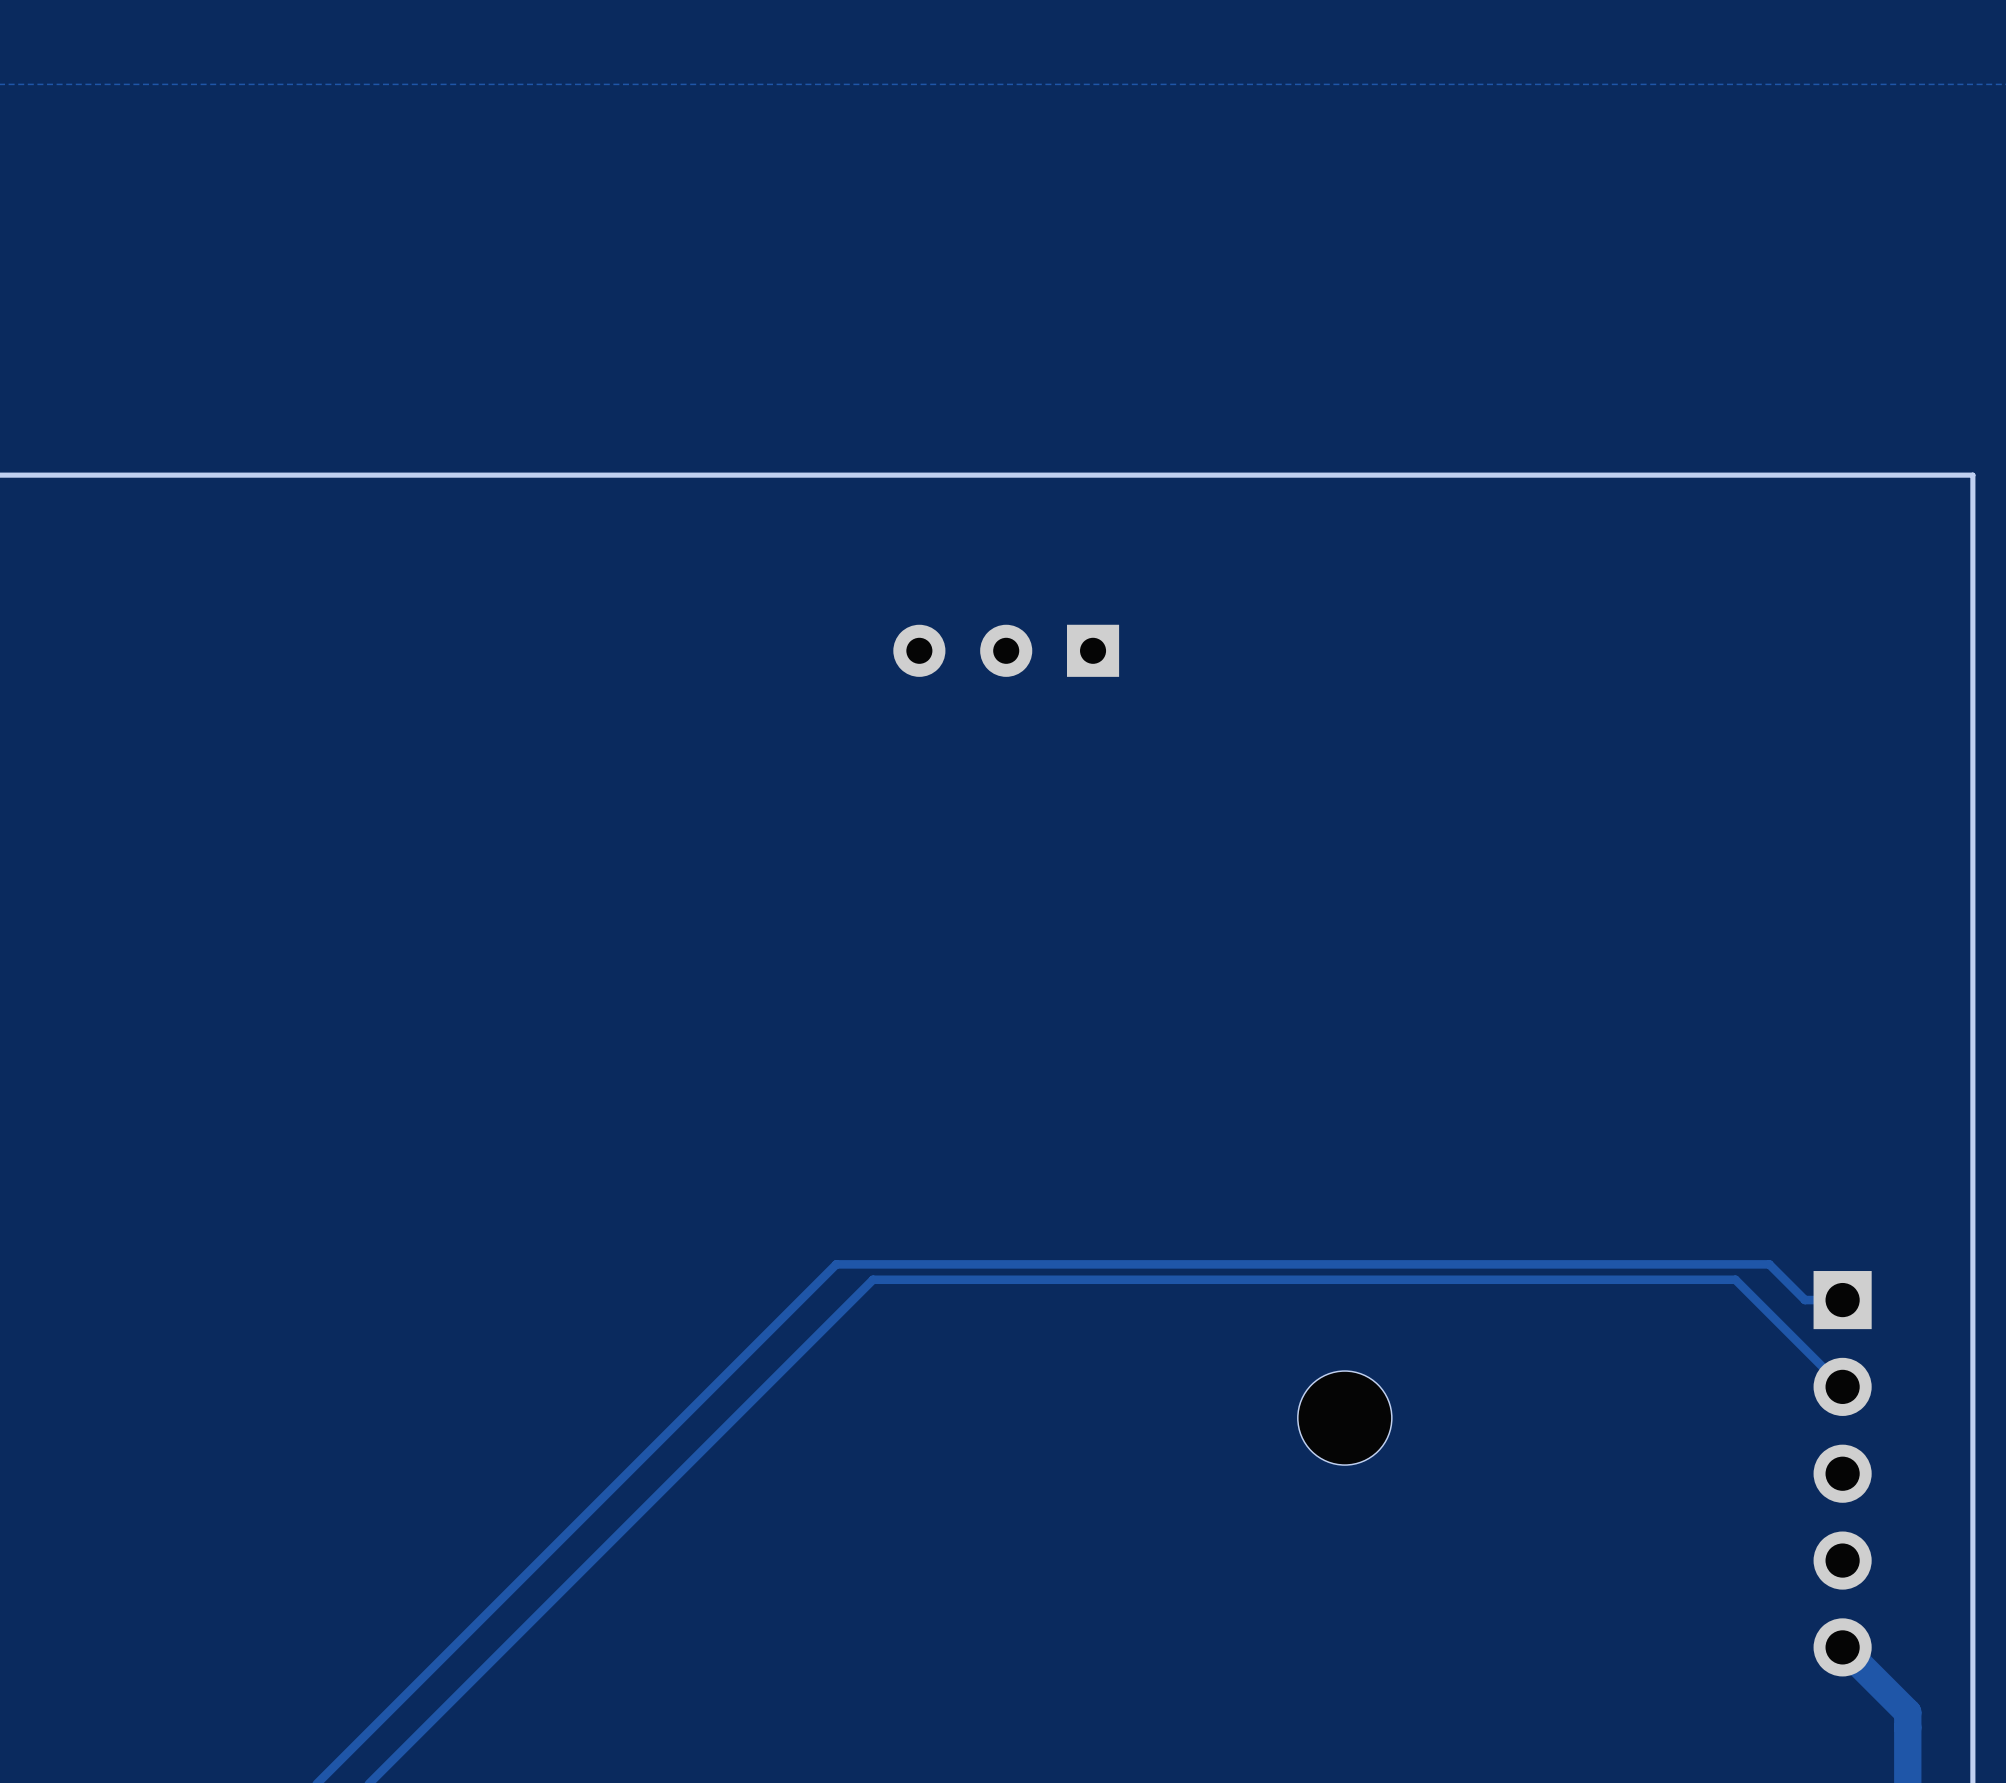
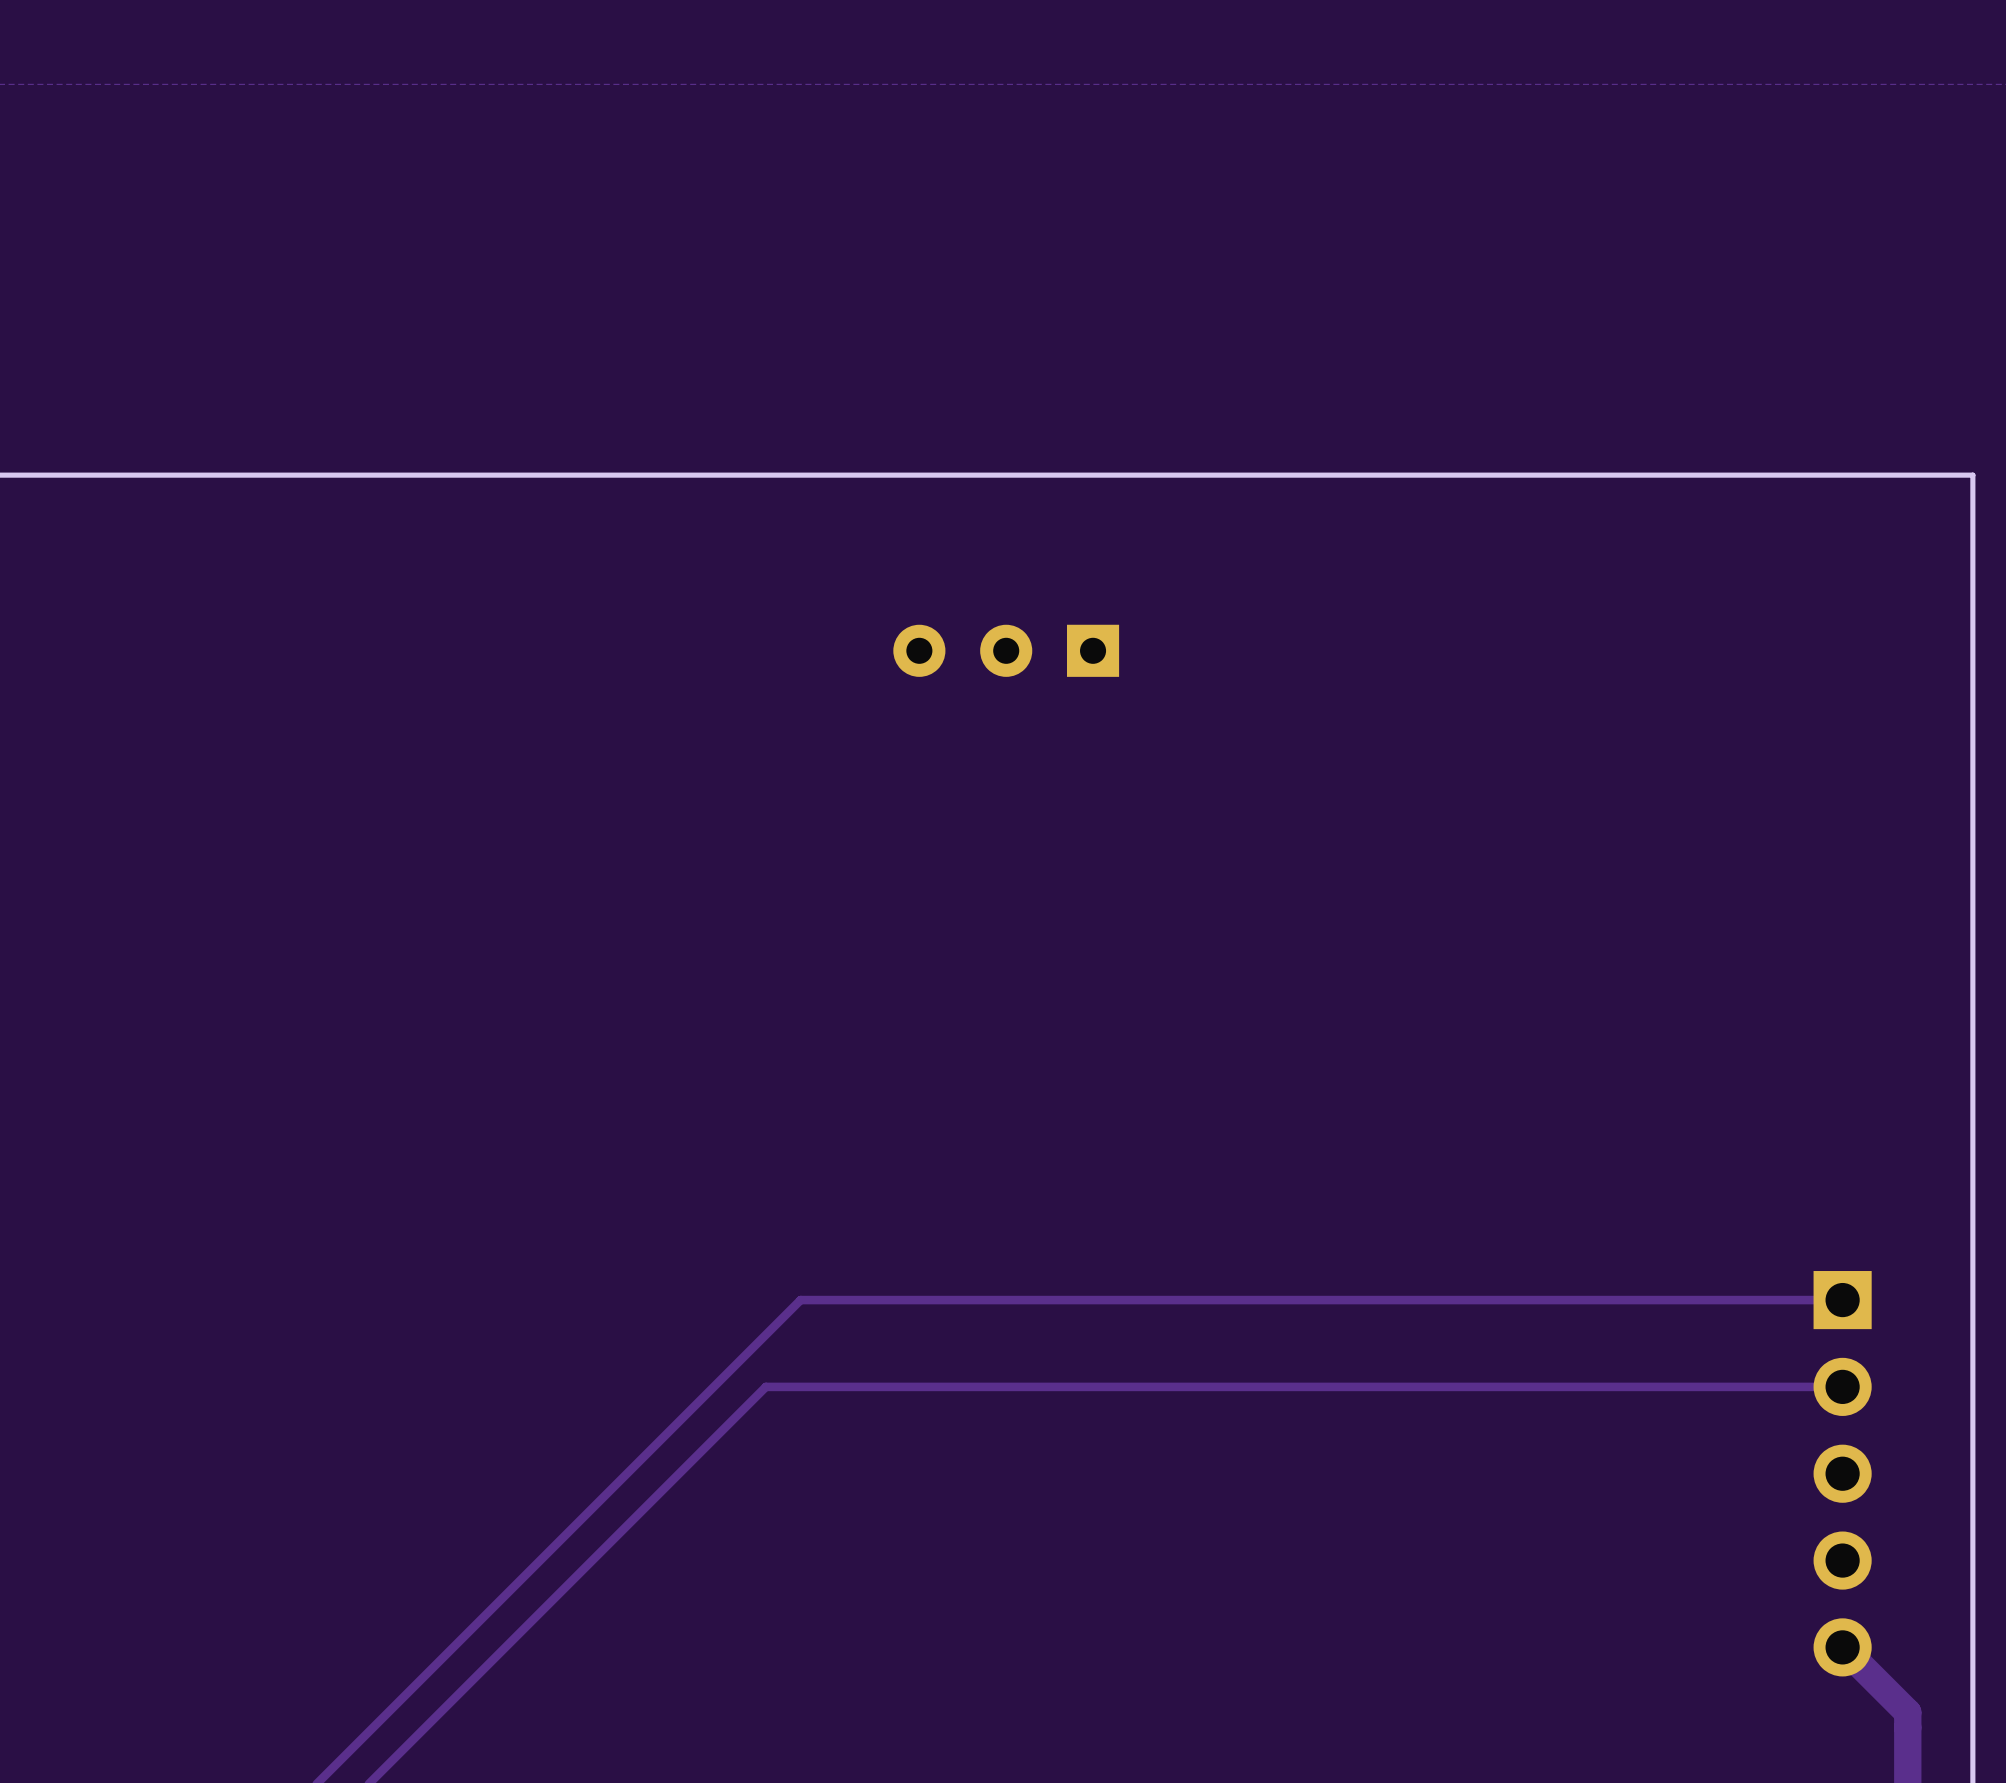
track: (1805, 1300) (1769, 1264) (836, 1264) (800, 1300) -> (1805, 1300) (800, 1300)
track: (1842, 1386) (1735, 1279) (873, 1279) (765, 1386) -> (1842, 1386) (765, 1386)
part: (1344, 1418) -> none

